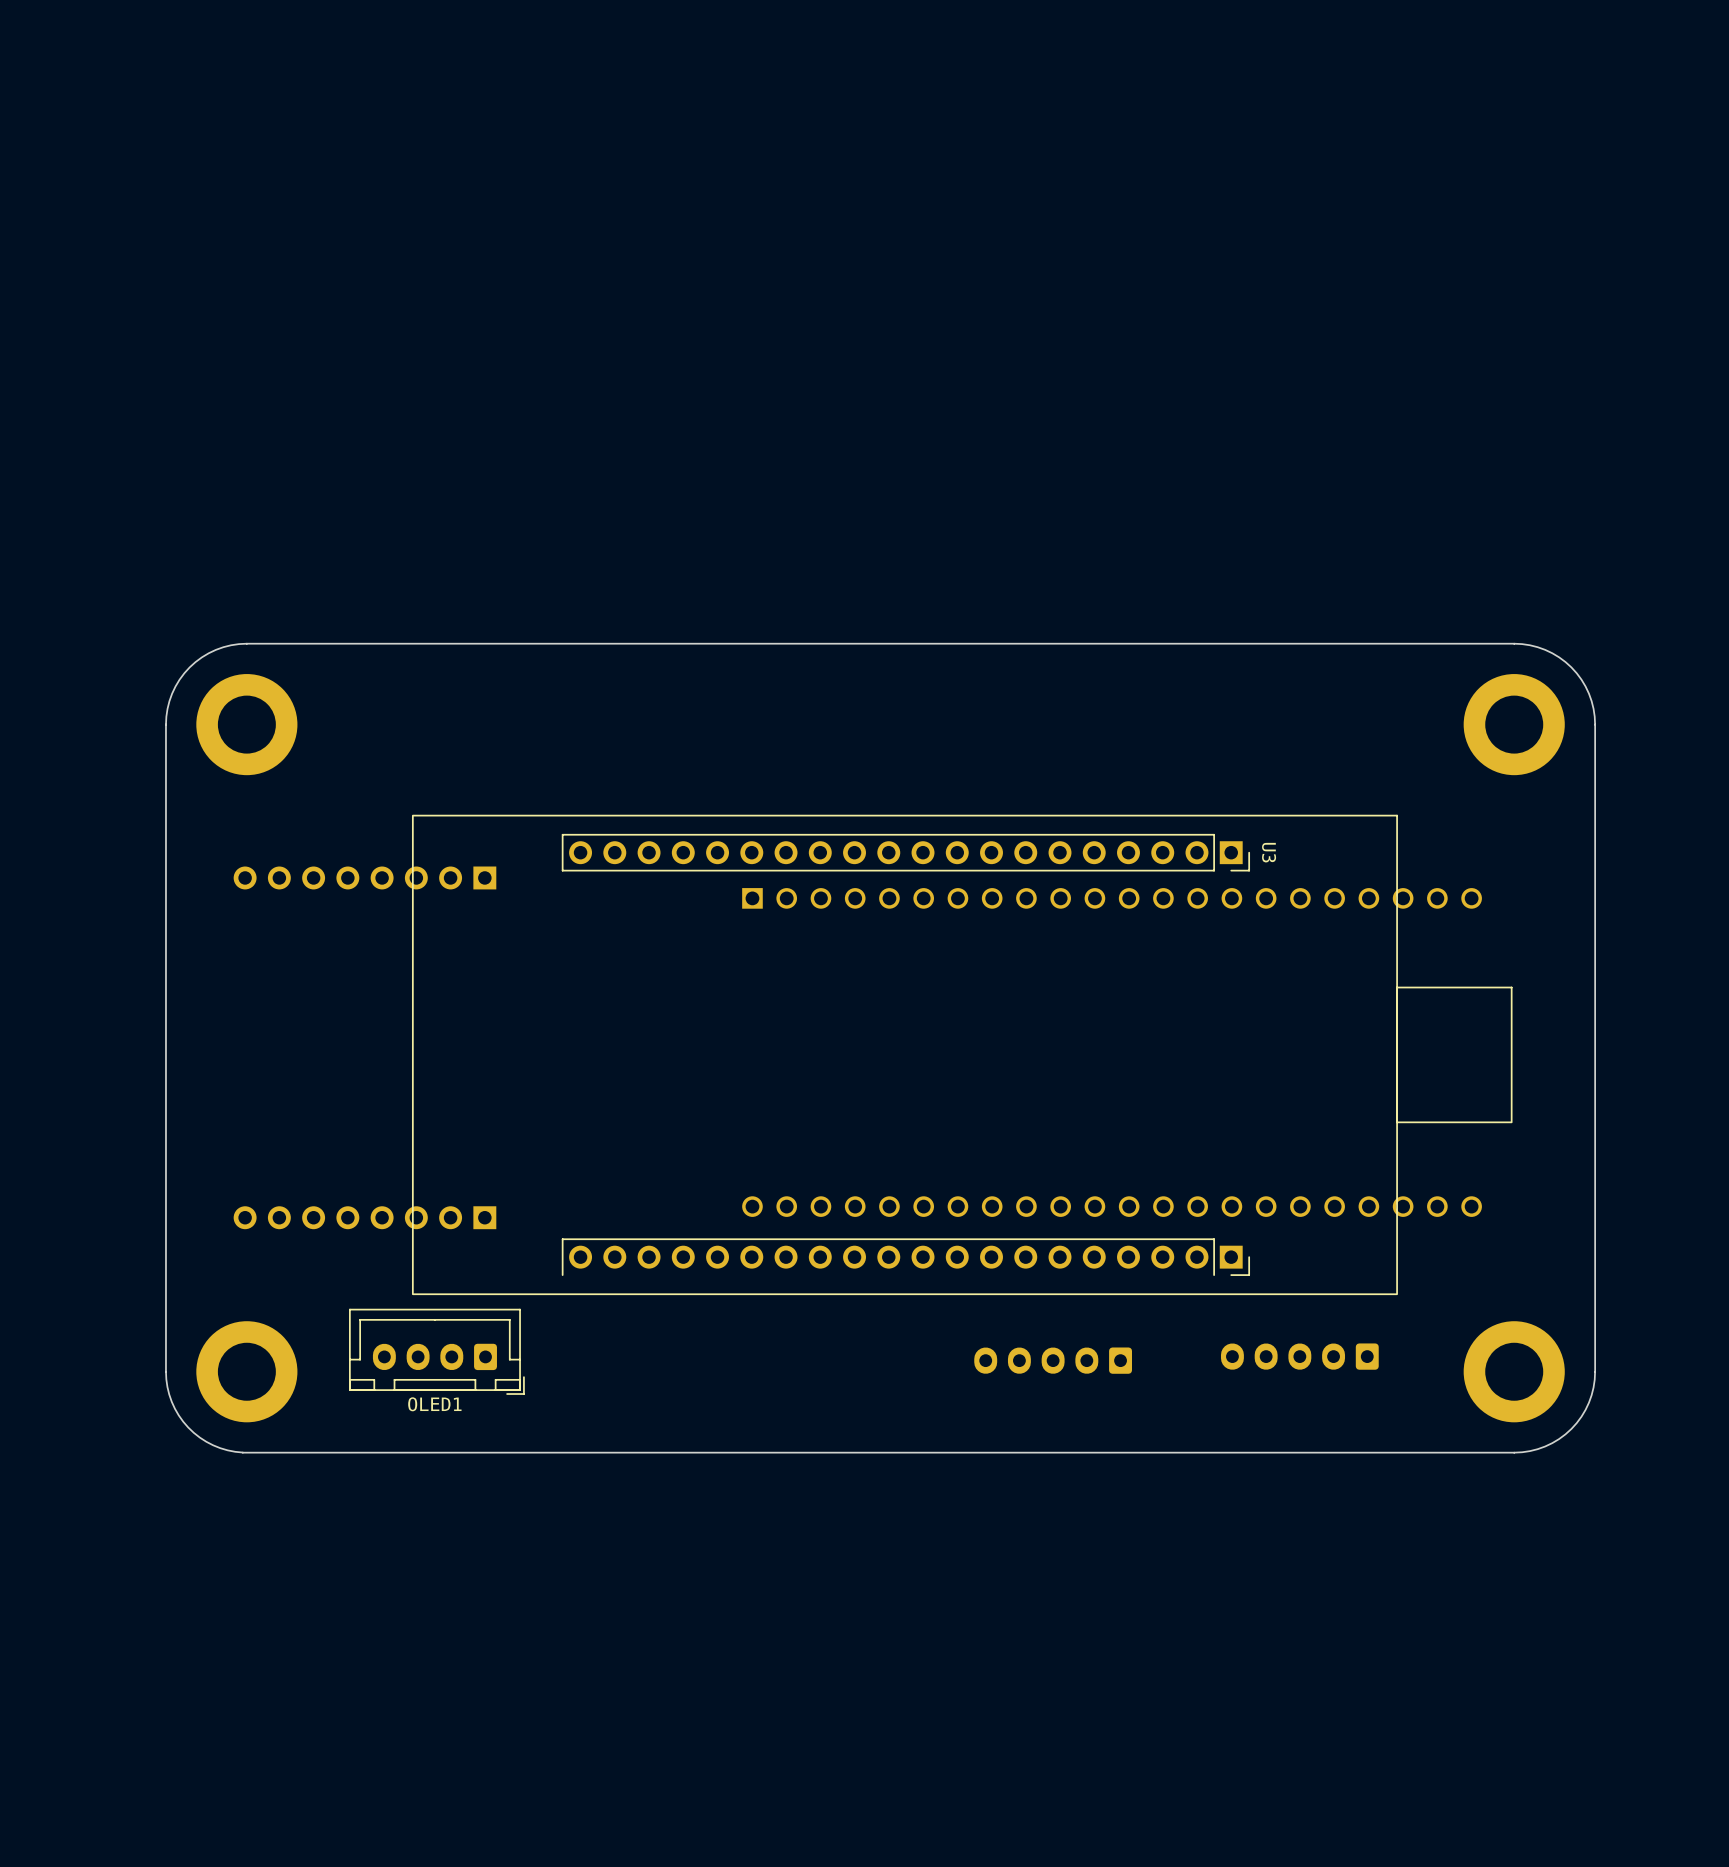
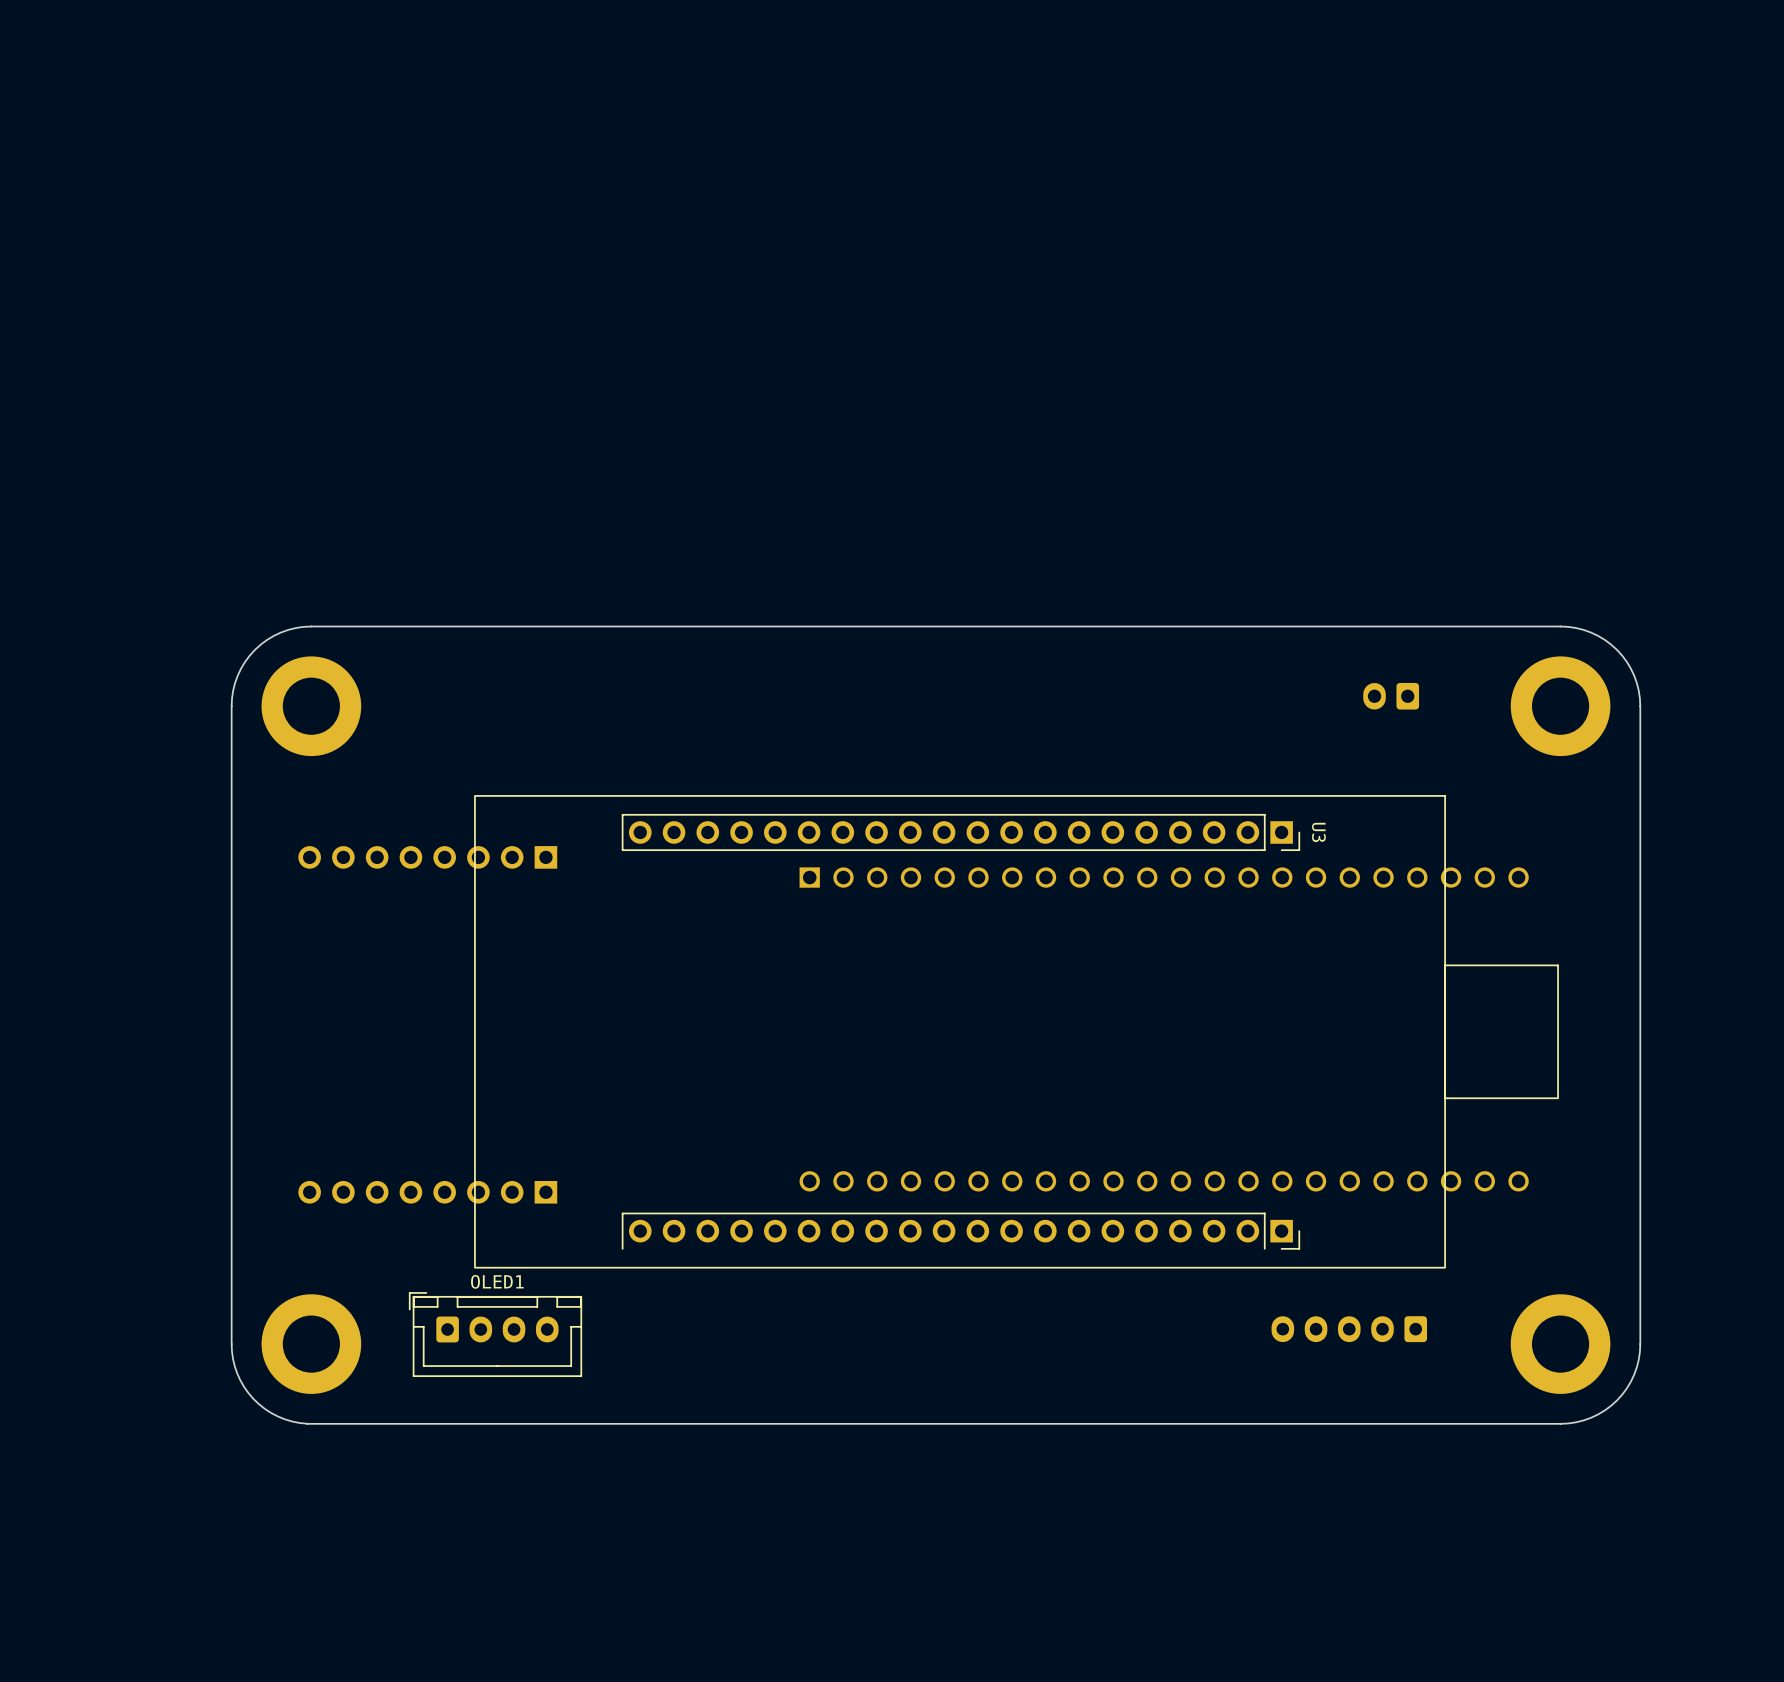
part: none -> (1391, 696)
OLED1 rotation: 0° (436, 1351) -> 180° (495, 1334)
part: (1053, 1360) -> none

